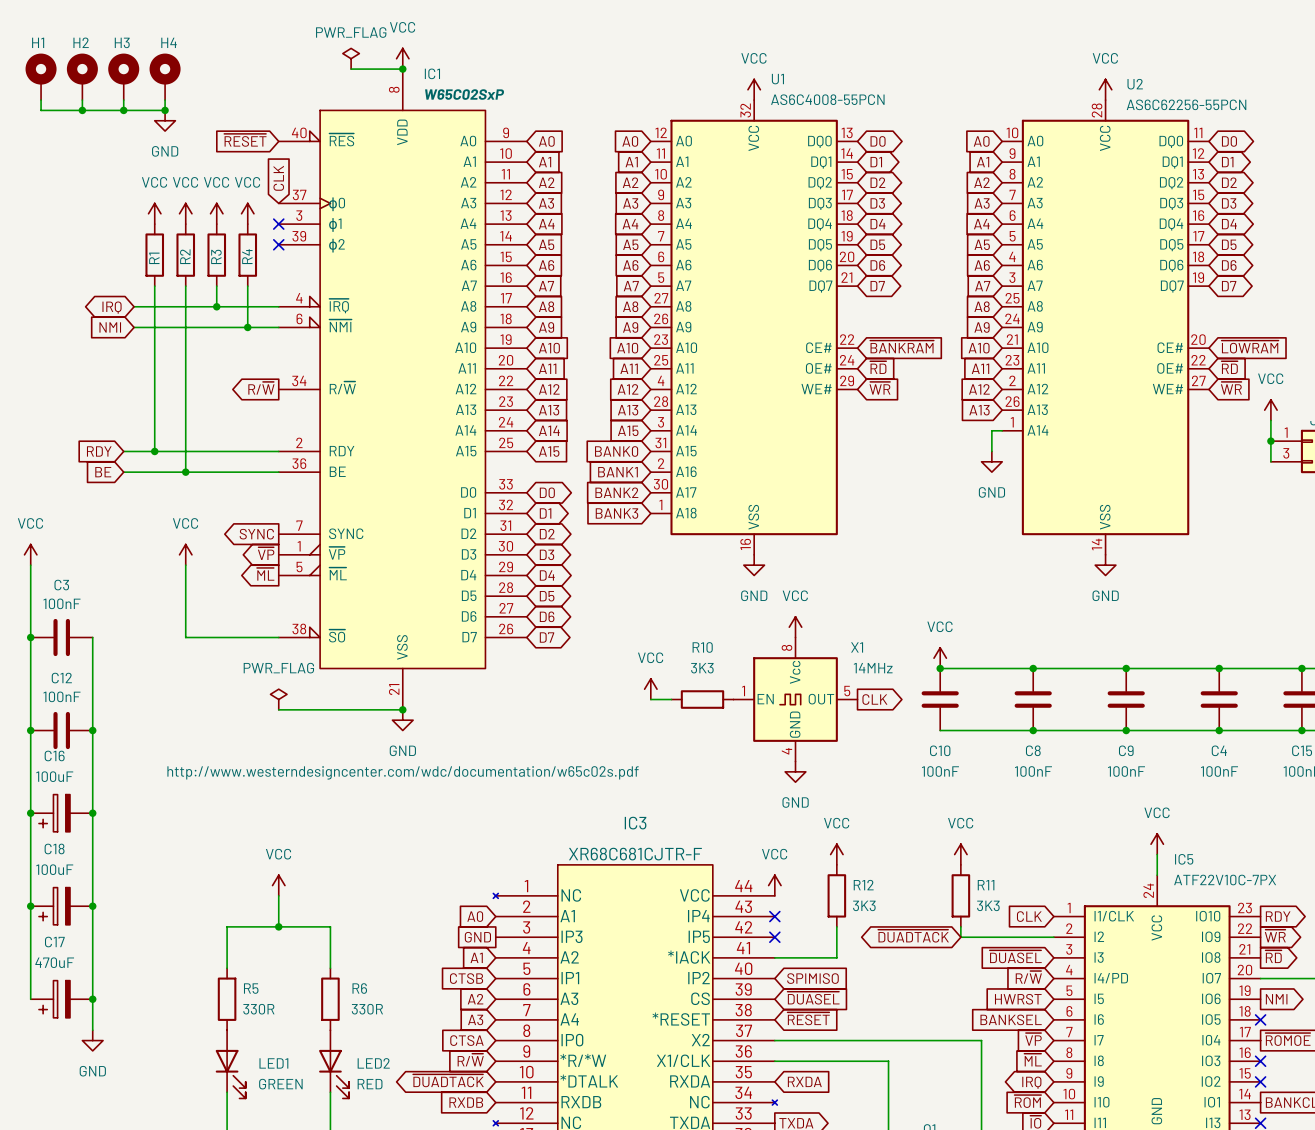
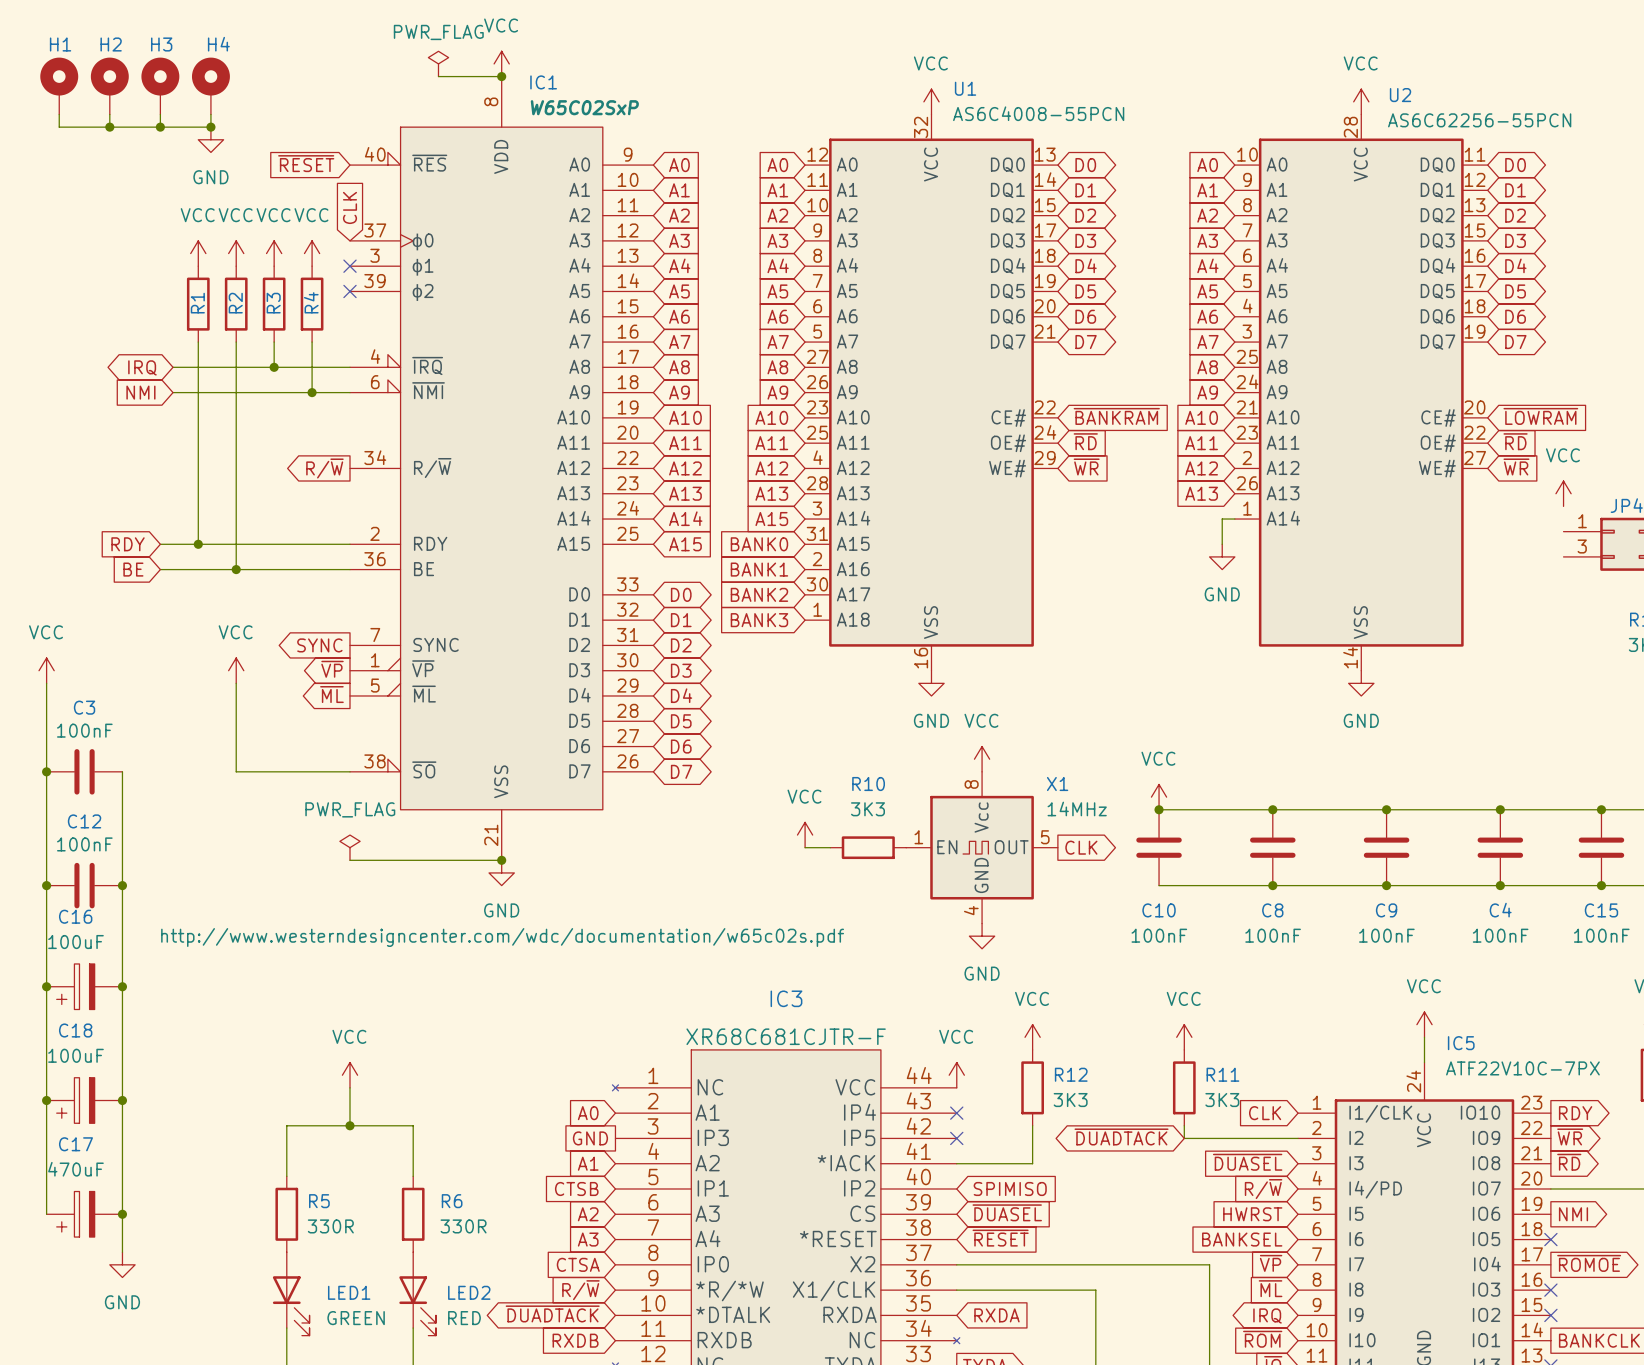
wire: (1270, 420) (1270, 461) -> none
junction: (1270, 441) -> none

